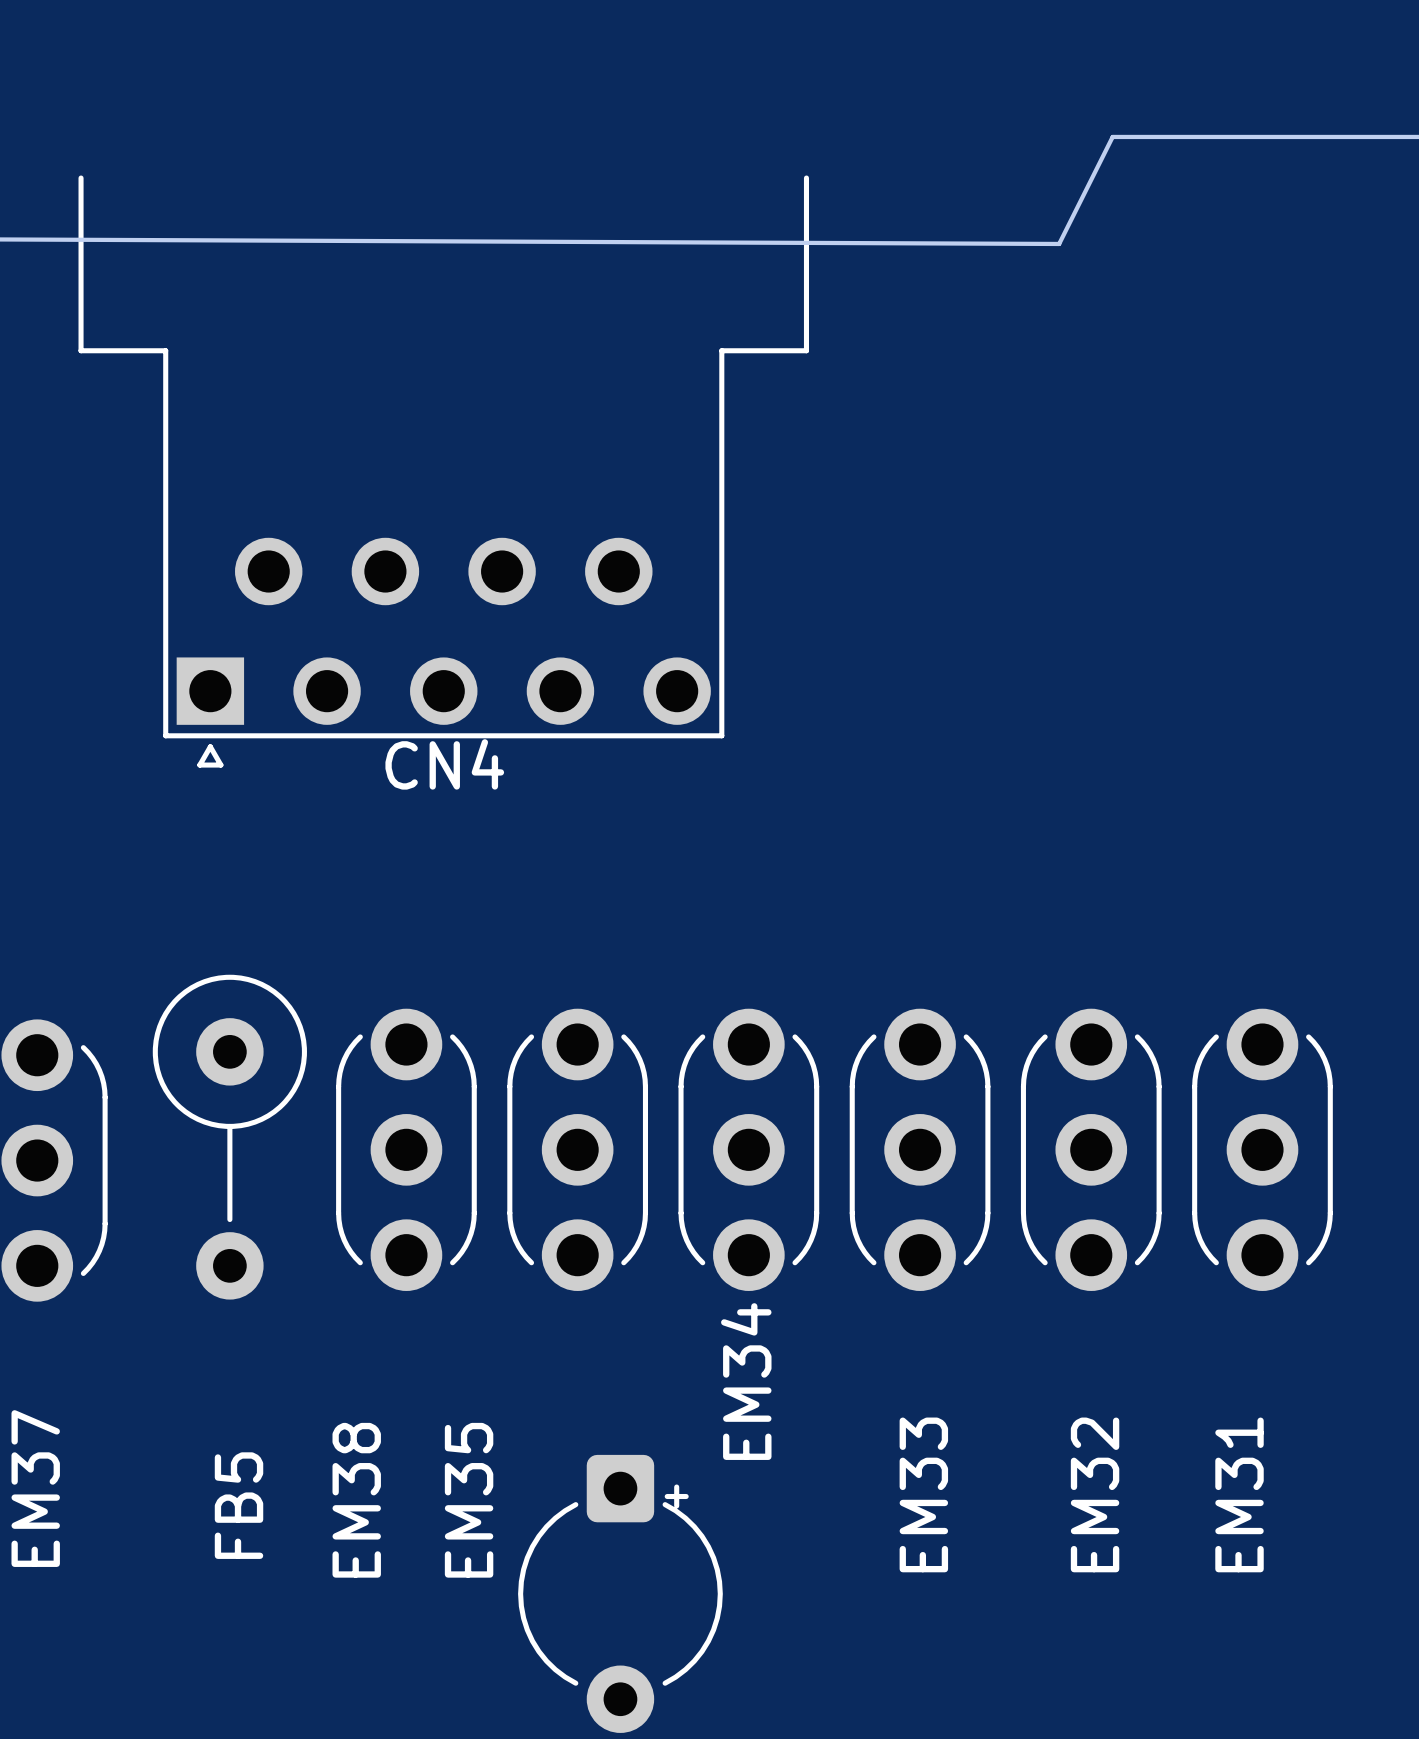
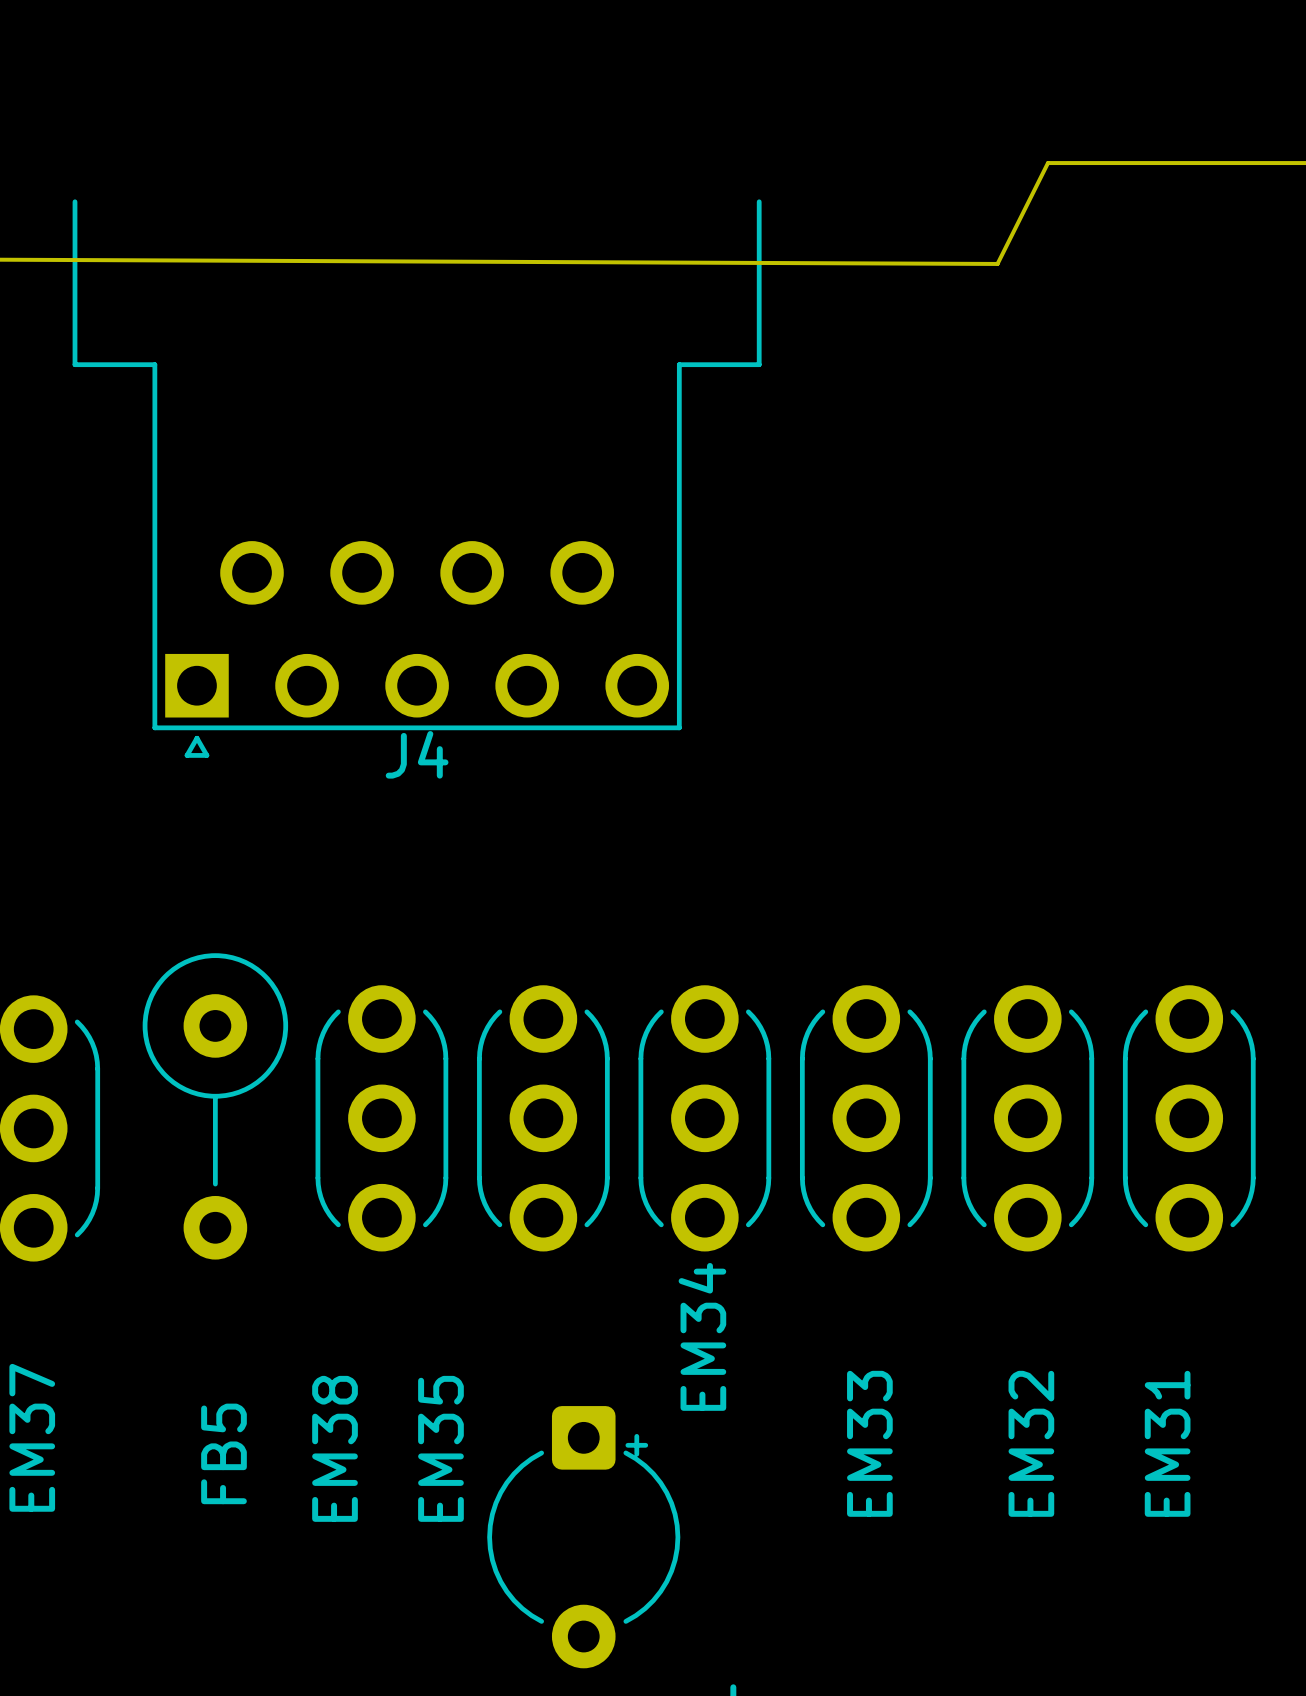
CN4 name: CN4 (444, 764) -> J4 (417, 754)

